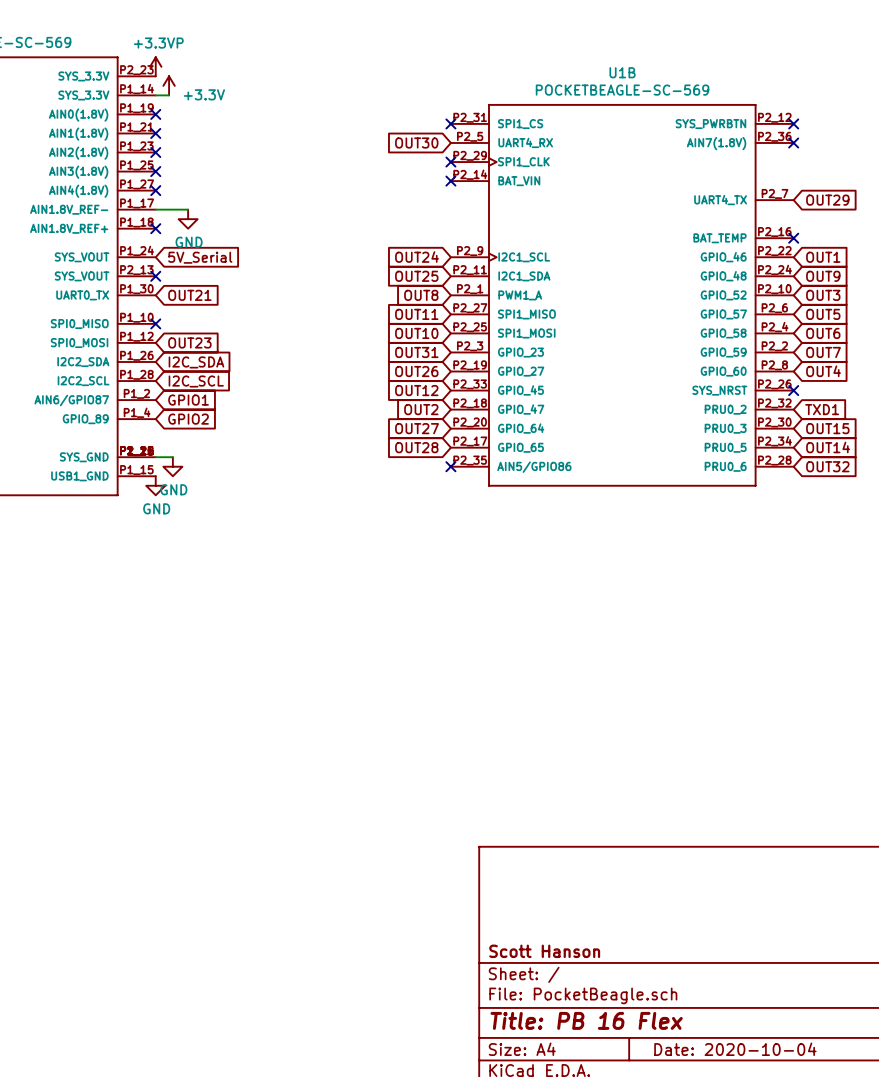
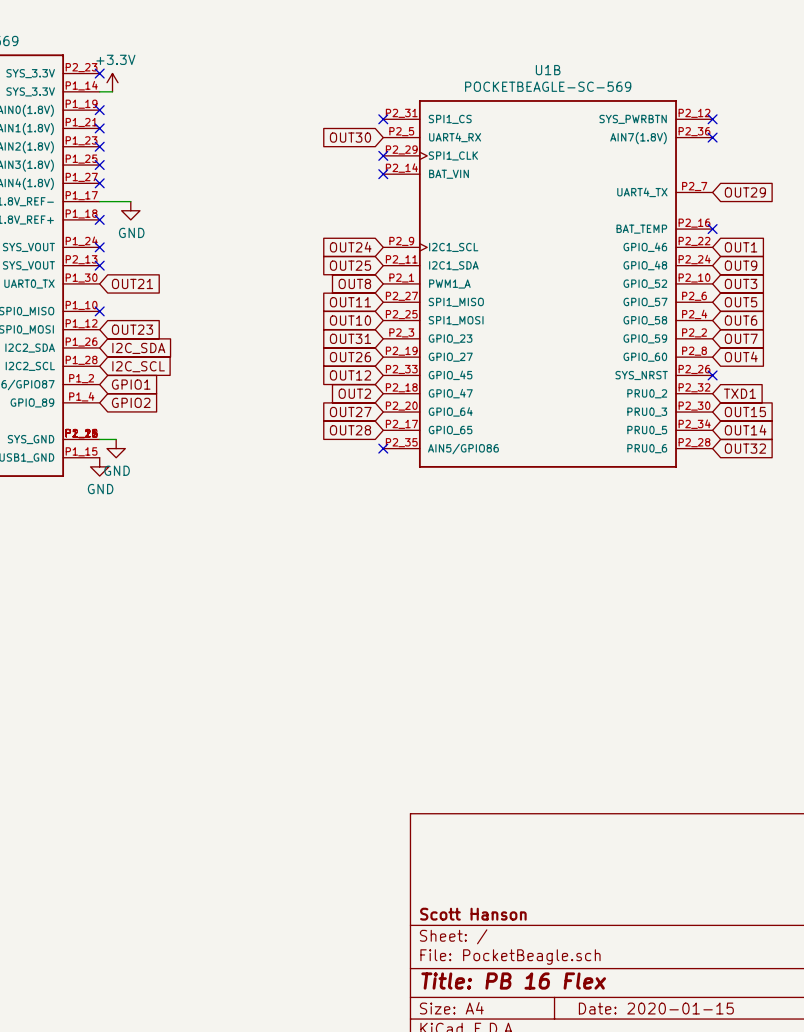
power symbol: +3.3VP (155, 66) -> none
no-connect mark: none -> (99, 73)
power symbol text position: +3.3V (204, 94) -> +3.3V (115, 59)
no-connect mark: none -> (99, 247)
global label: 5V_Serial (200, 257) -> none
title block: Date: 2020-10-04 (735, 1049) -> Date: 2020-01-15 (656, 1008)

